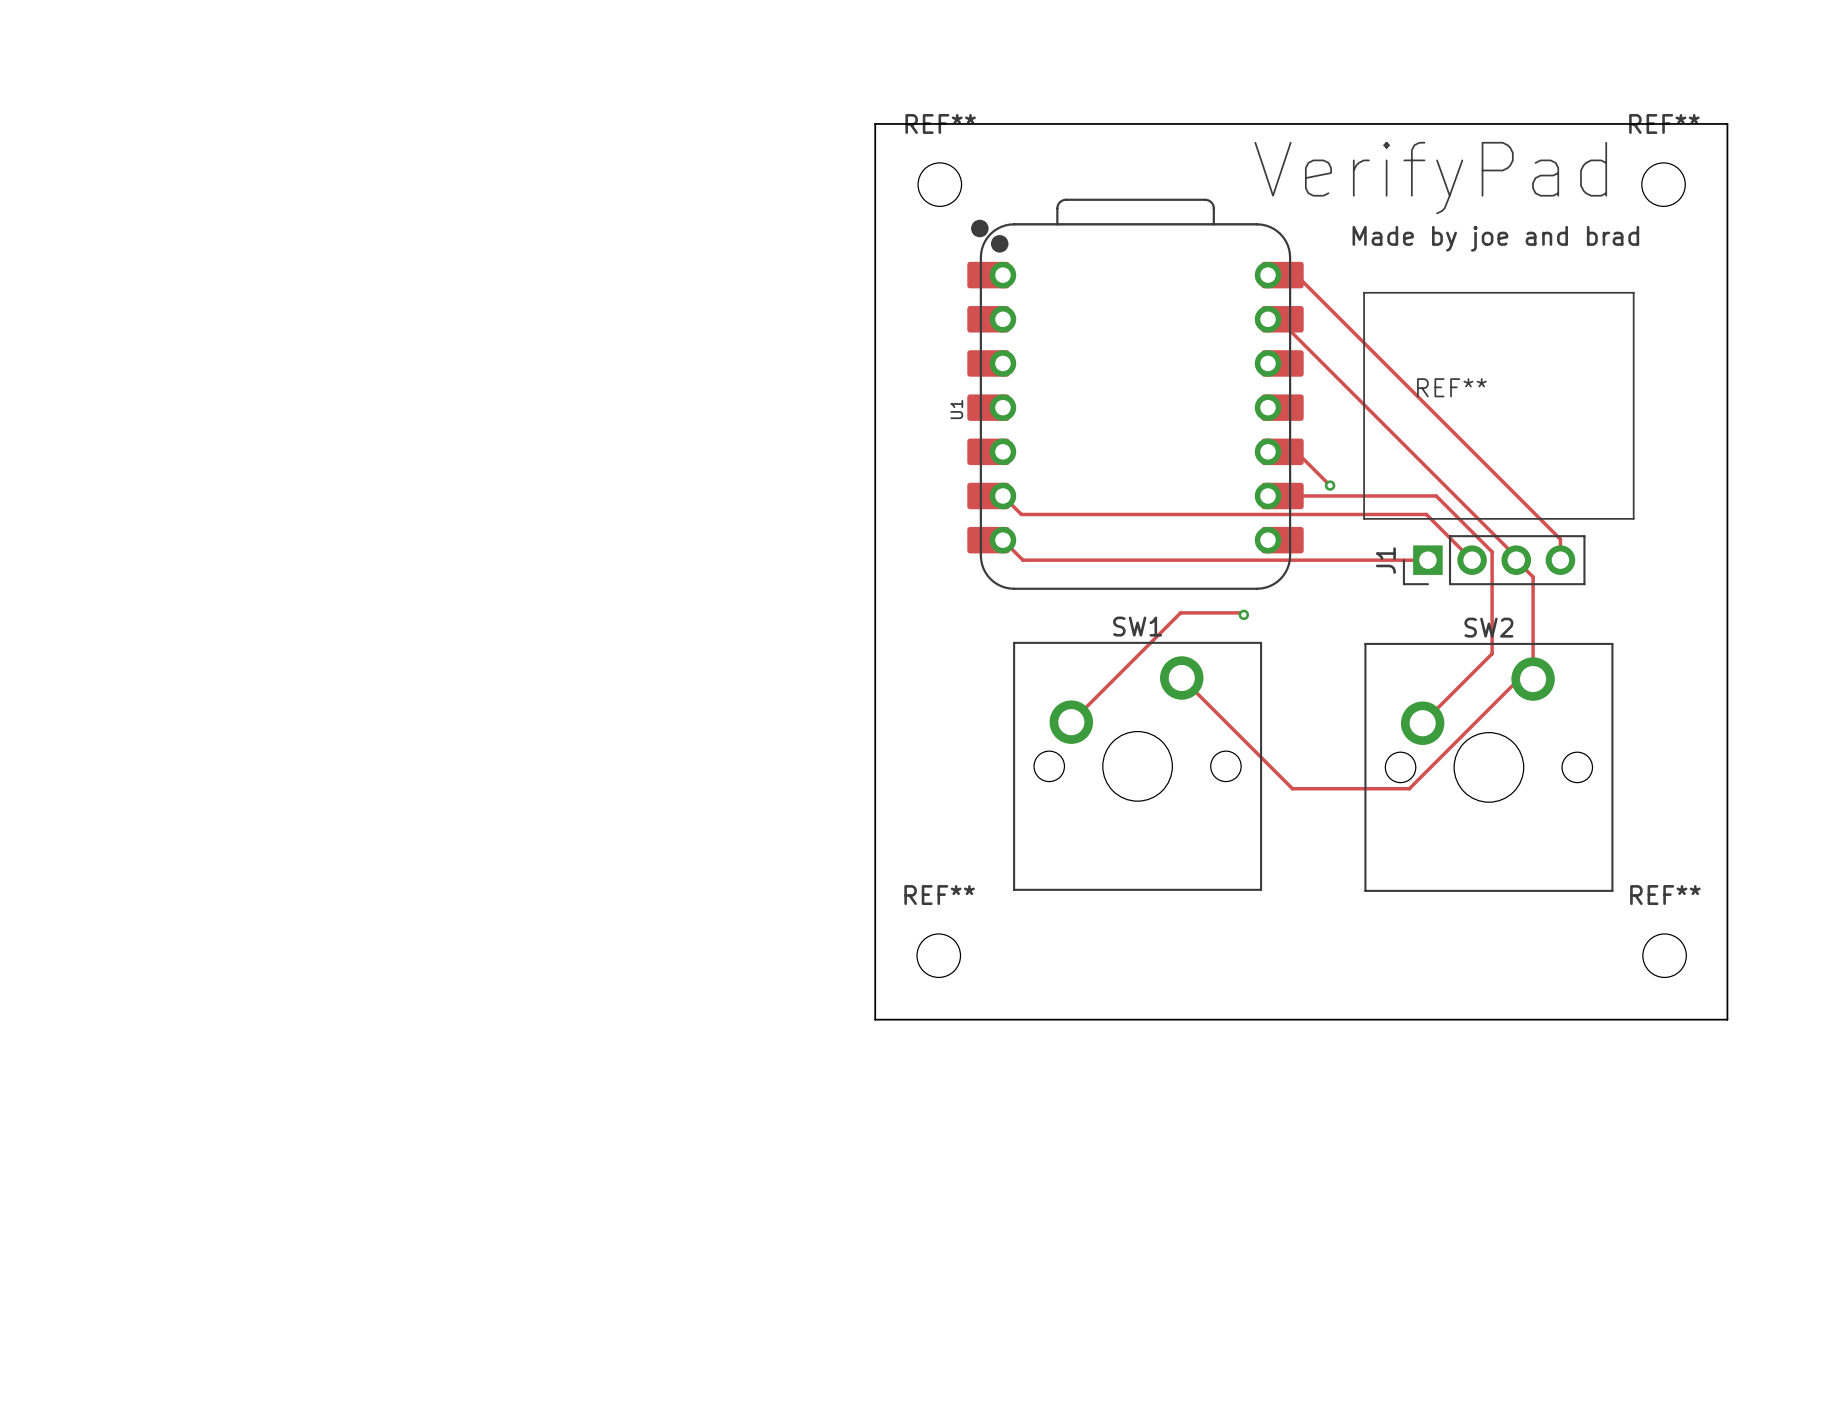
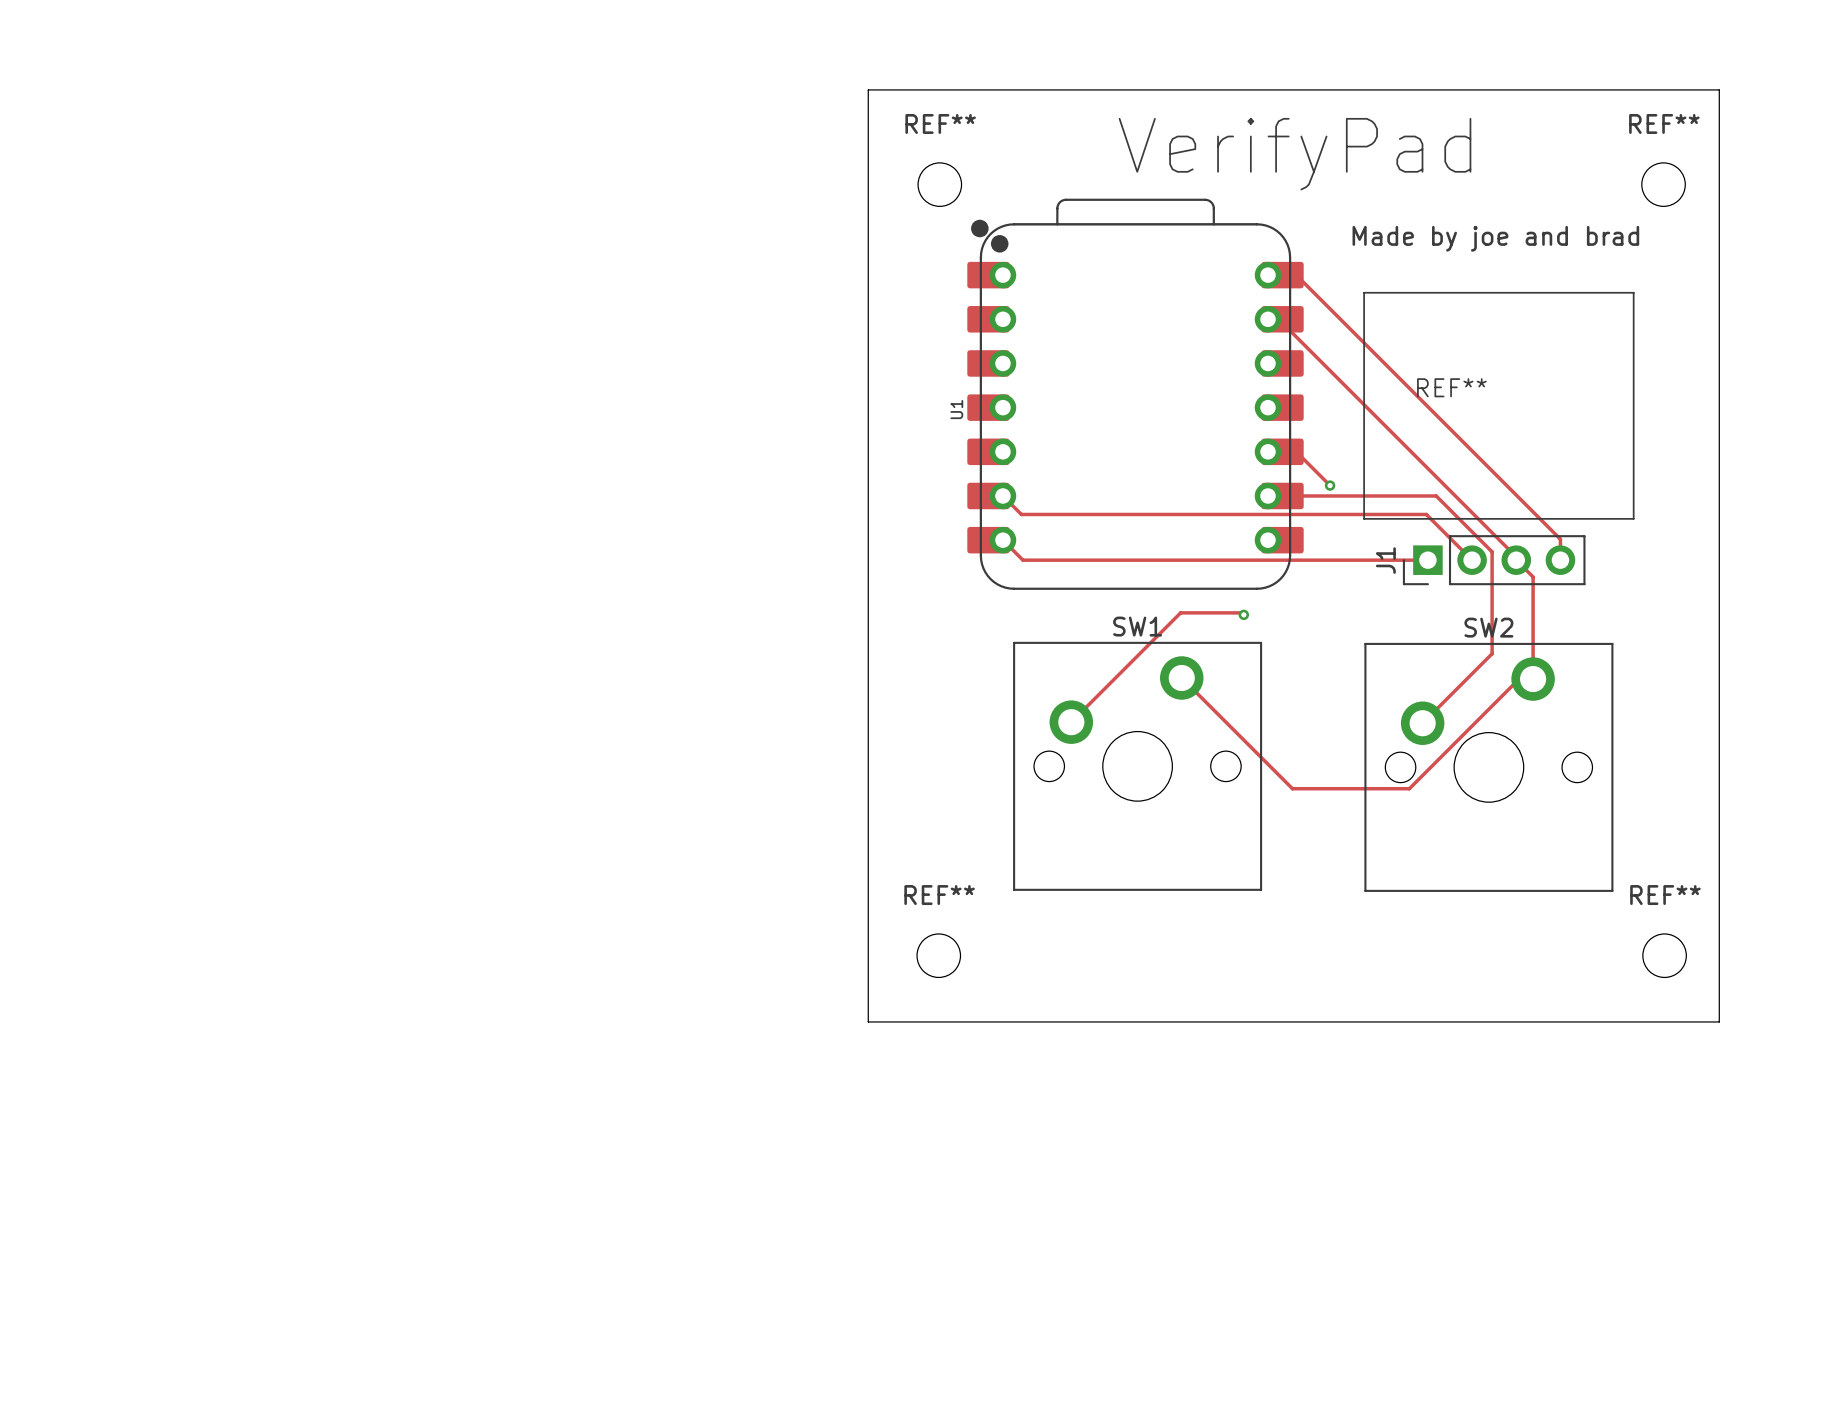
board edge: (875, 123) (1727, 123) (1727, 1019) (875, 1019) (875, 123) -> (868, 89) (868, 1021) (1719, 1021) (1719, 89) (868, 89)
text position: VerifyPad (1430, 178) -> VerifyPad (1295, 154)

